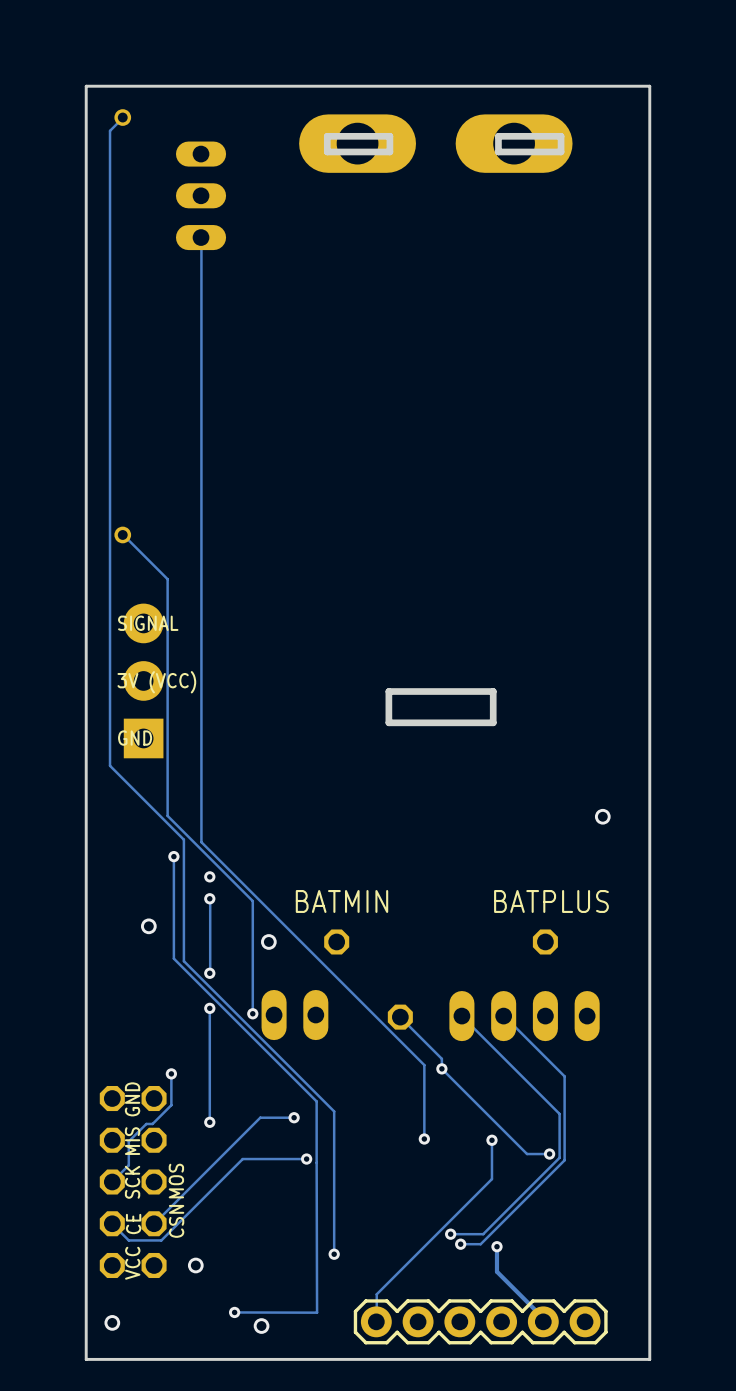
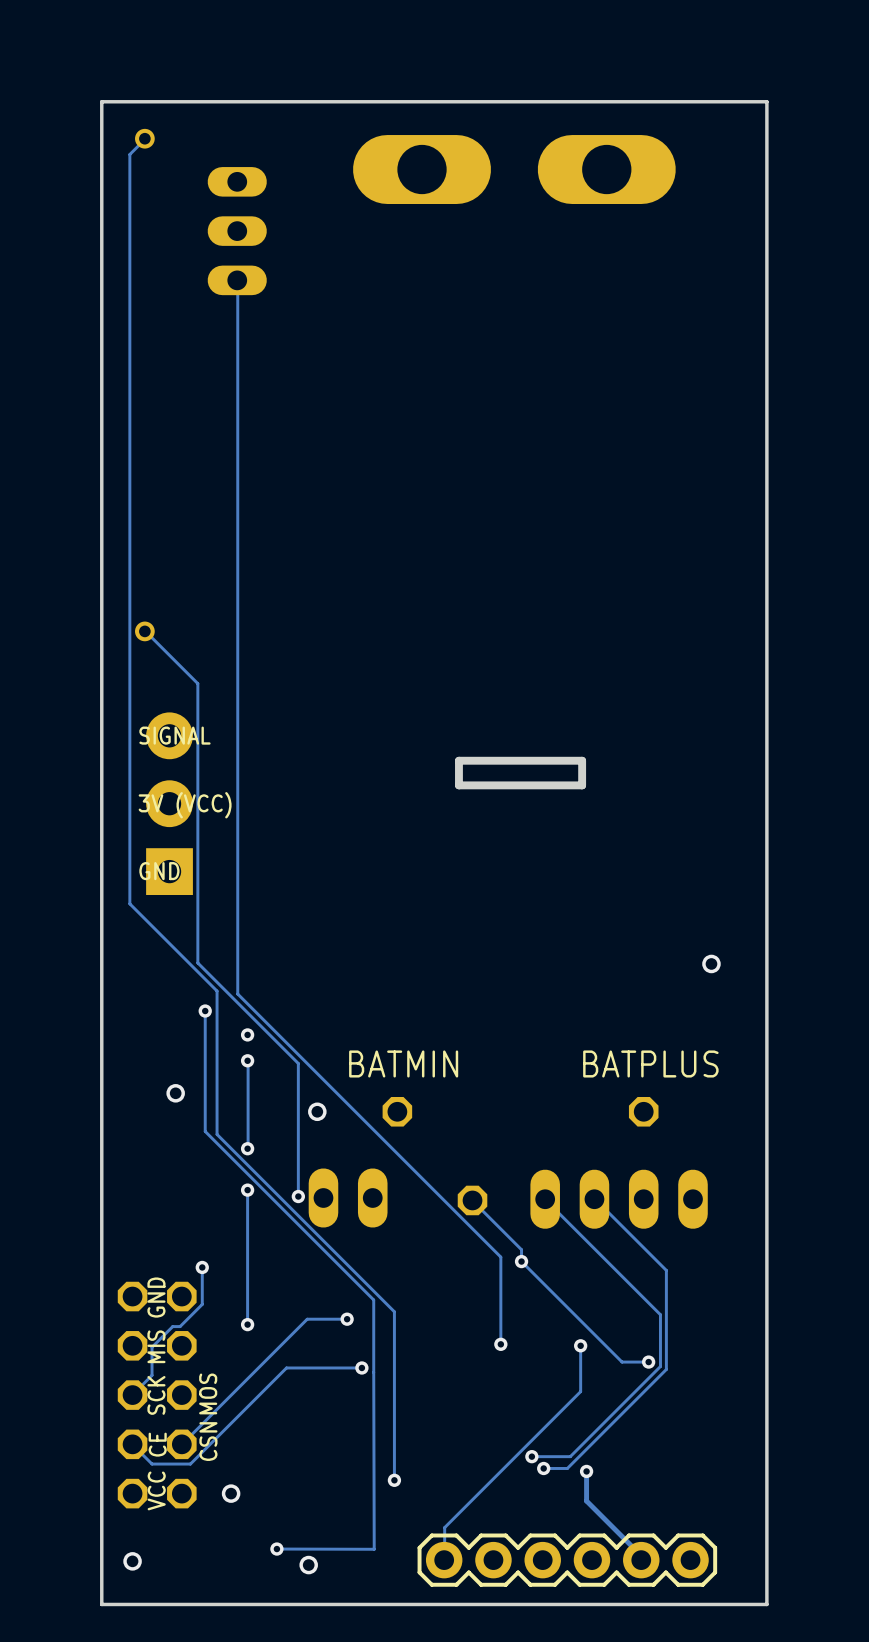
board edge: (389, 136) (327, 136) (327, 151) (389, 151) (389, 136) -> none
board edge: (561, 136) (561, 151) (498, 151) (498, 136) (561, 136) -> none
board edge: none -> (582, 760) (582, 785) (458, 785) (458, 760) (582, 760)
board edge: (493, 691) (493, 722) (388, 722) (388, 691) (493, 691) -> none

